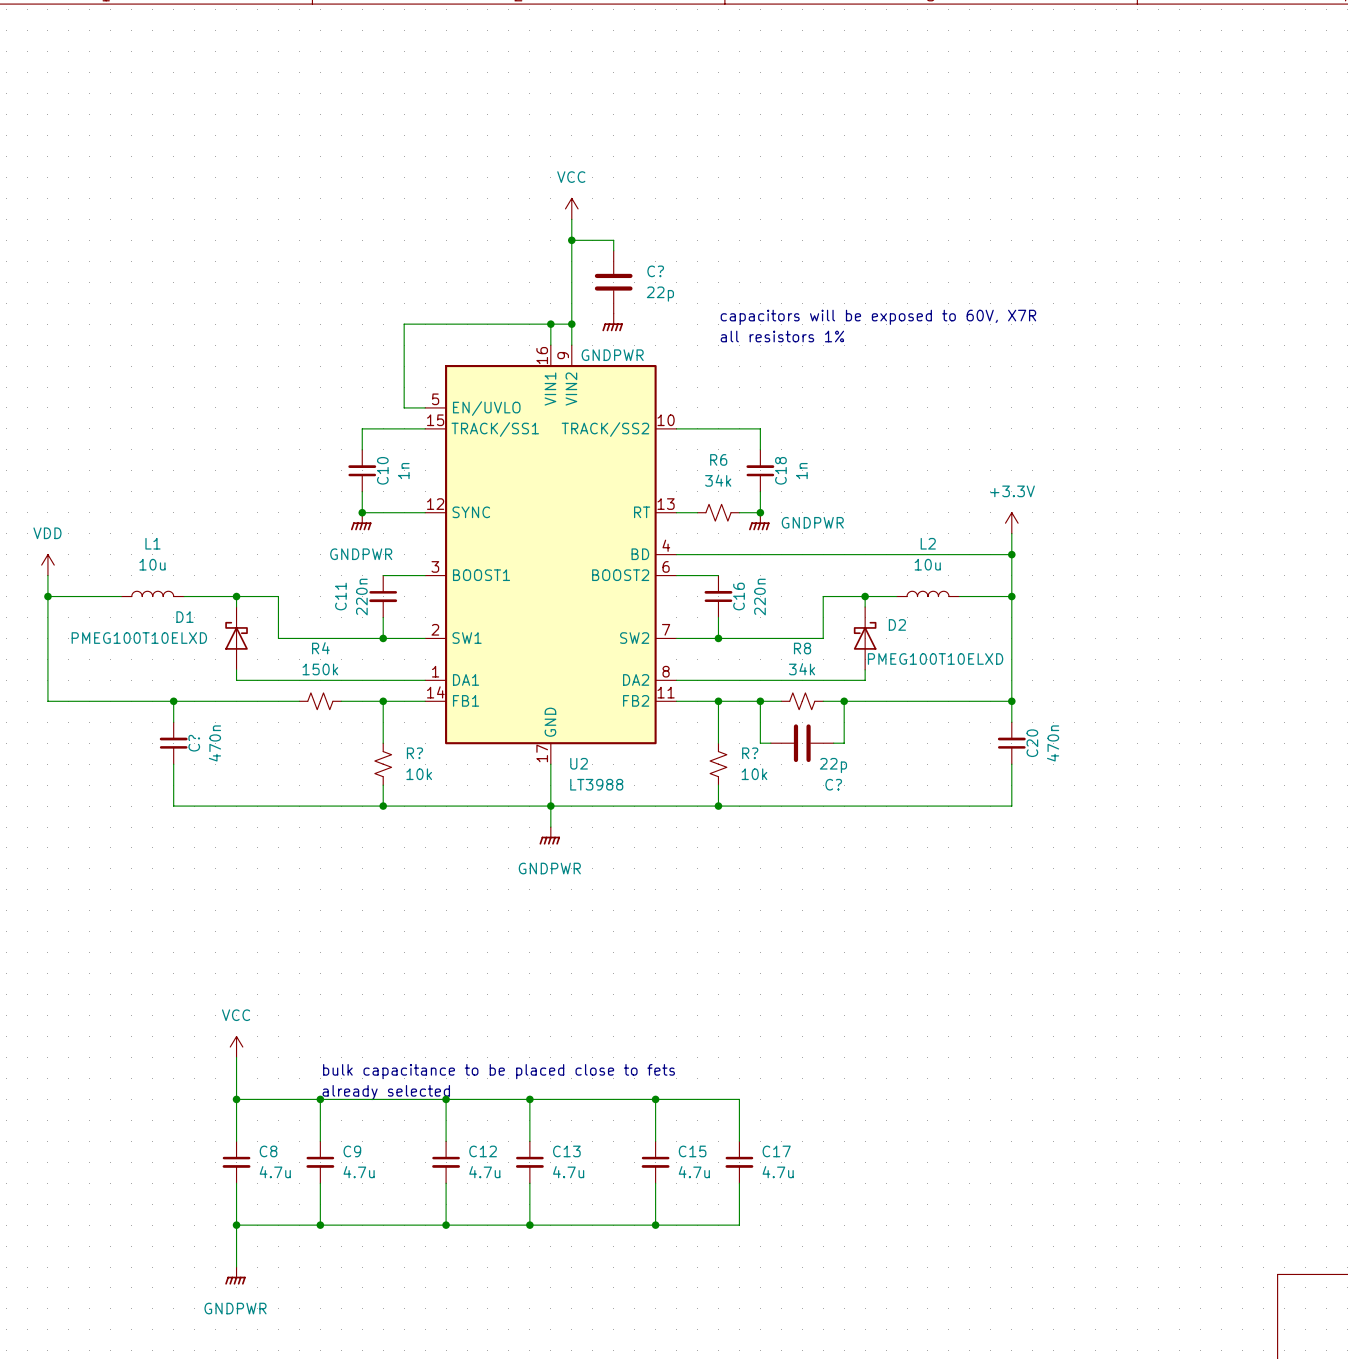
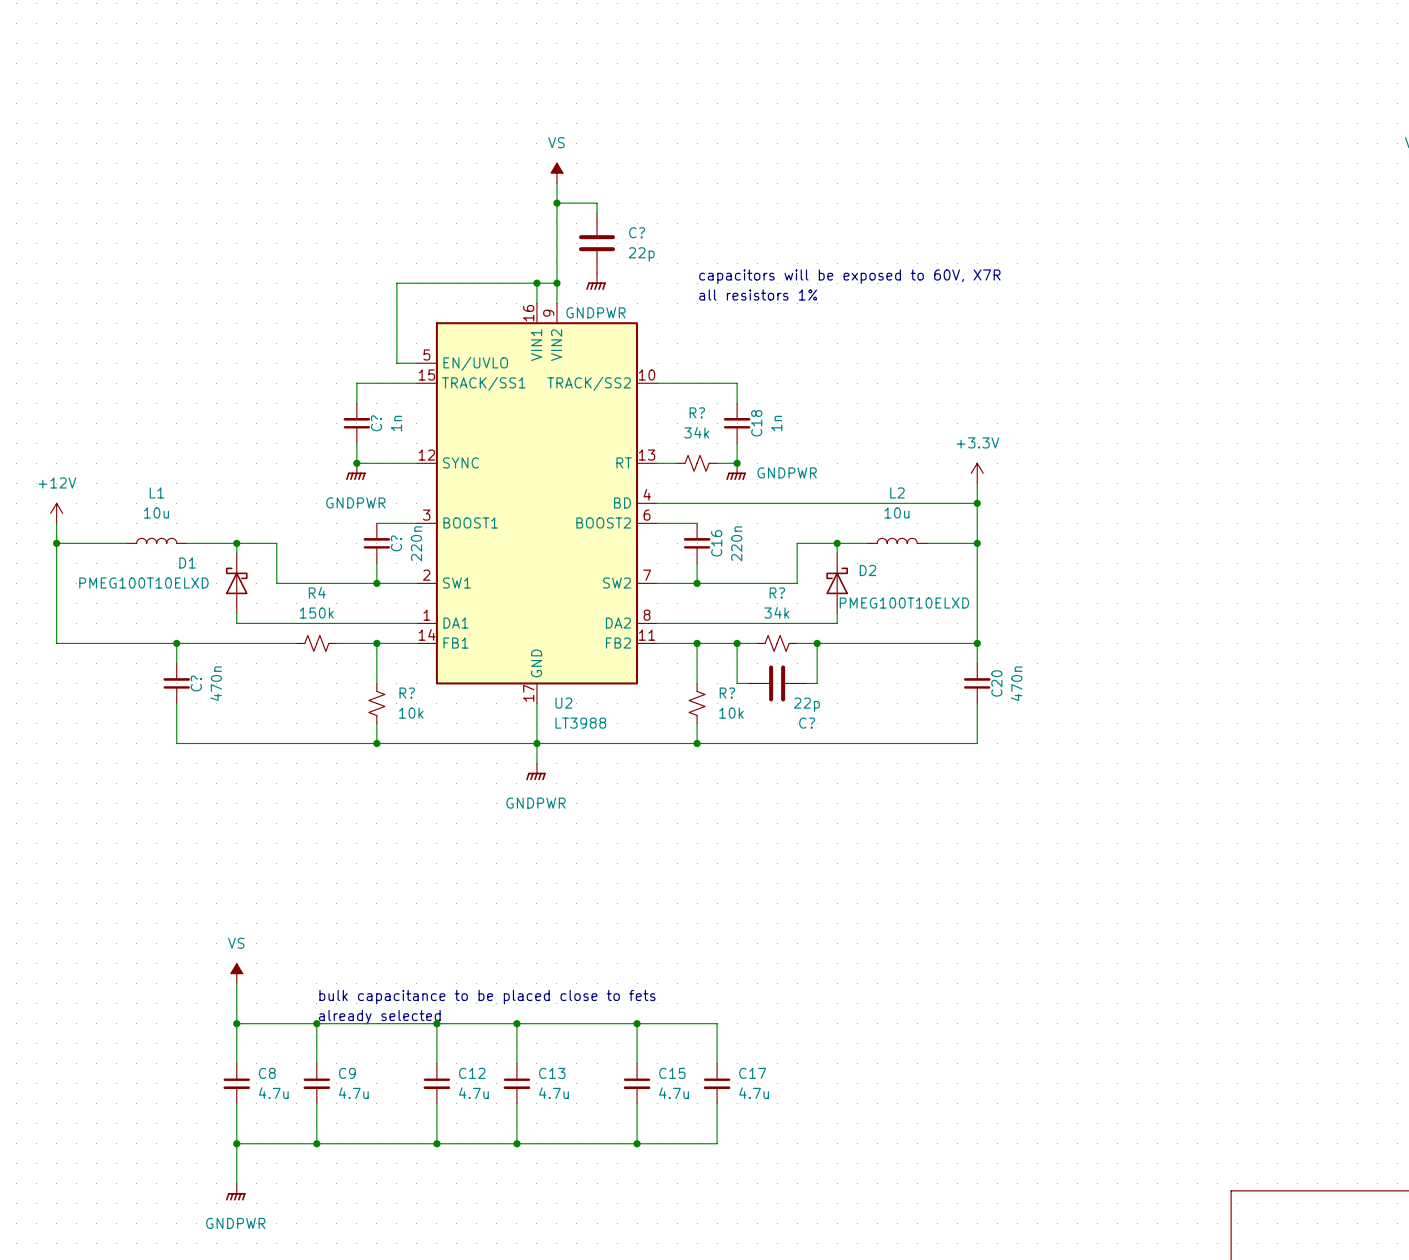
power symbol: VCC (571, 208) -> VS (556, 173)
R6 name: R6 (718, 459) -> R? (697, 412)
C10 name: C10 (382, 470) -> C? (376, 423)
power symbol: VDD (47, 565) -> +12V (56, 513)
C11: 220n (383, 596) -> none
C?: none -> 220n (376, 543)
R8 name: R8 (802, 648) -> R? (777, 593)
power symbol: VCC (236, 1047) -> VS (236, 973)

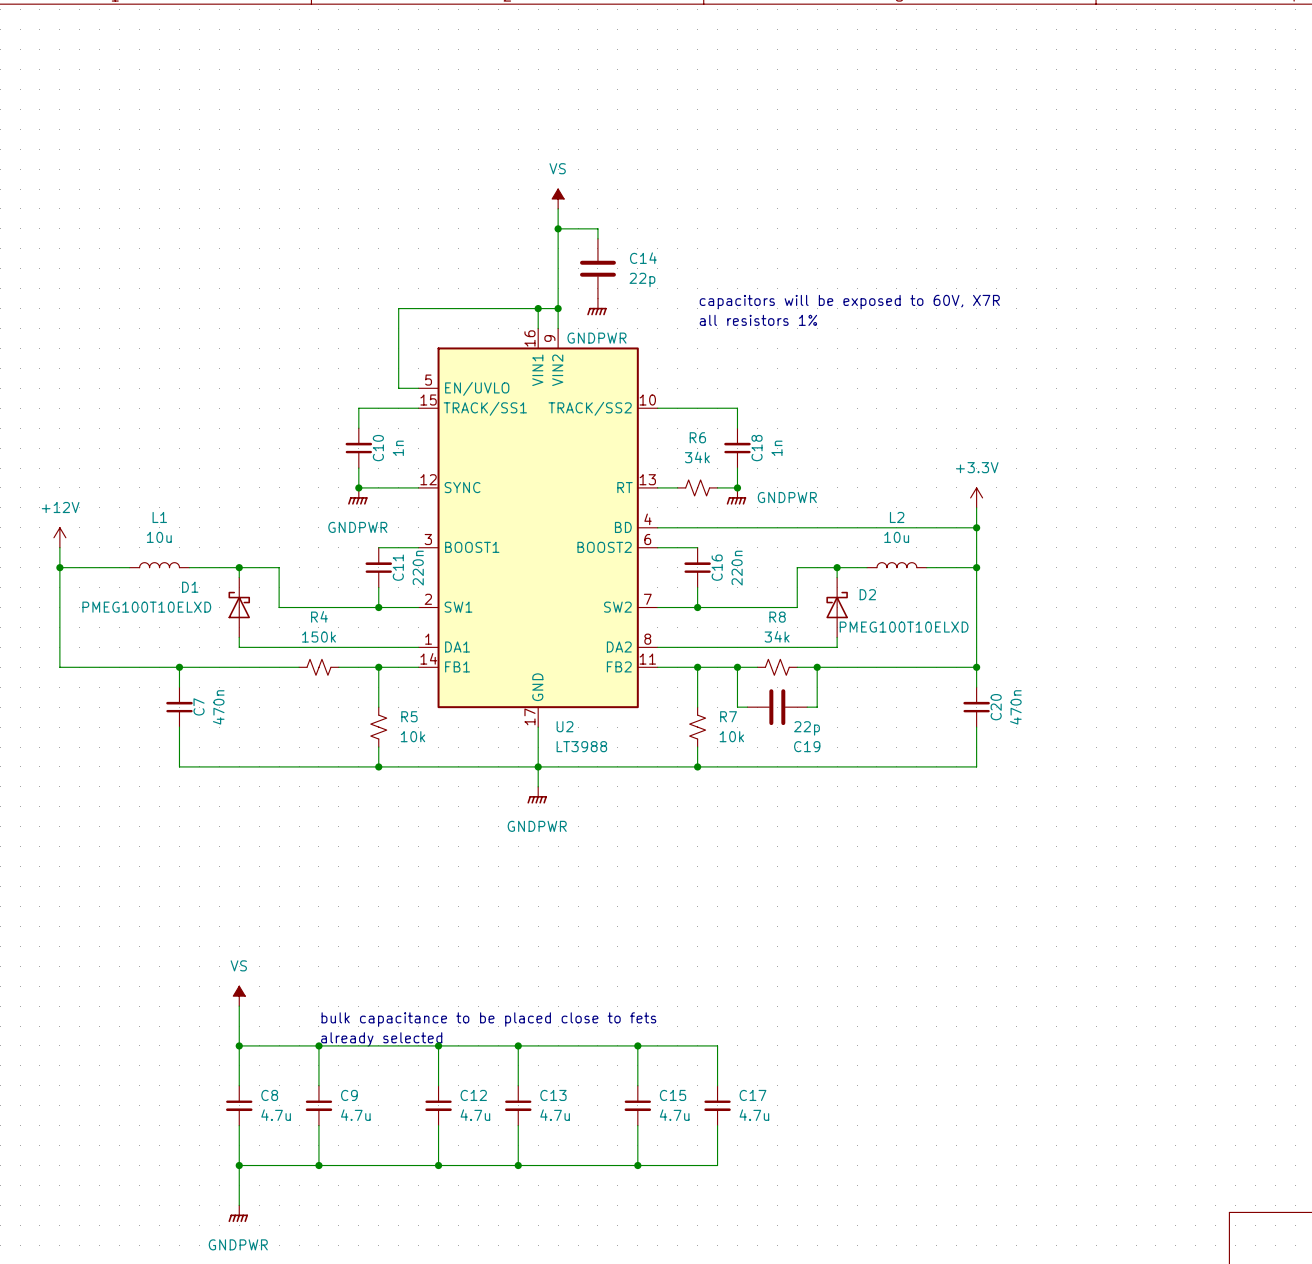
C? name: C? (637, 232) -> C14 (643, 258)
R? name: R? (697, 412) -> R6 (697, 437)
C? name: C? (376, 423) -> C10 (378, 448)
C? name: C? (396, 543) -> C11 (398, 567)
R? name: R? (777, 593) -> R8 (777, 617)
C? name: C? (196, 683) -> C7 (199, 706)
R? name: R? (407, 693) -> R5 (409, 716)
R? name: R? (727, 693) -> R7 (728, 716)
C? name: C? (807, 723) -> C19 (807, 746)

